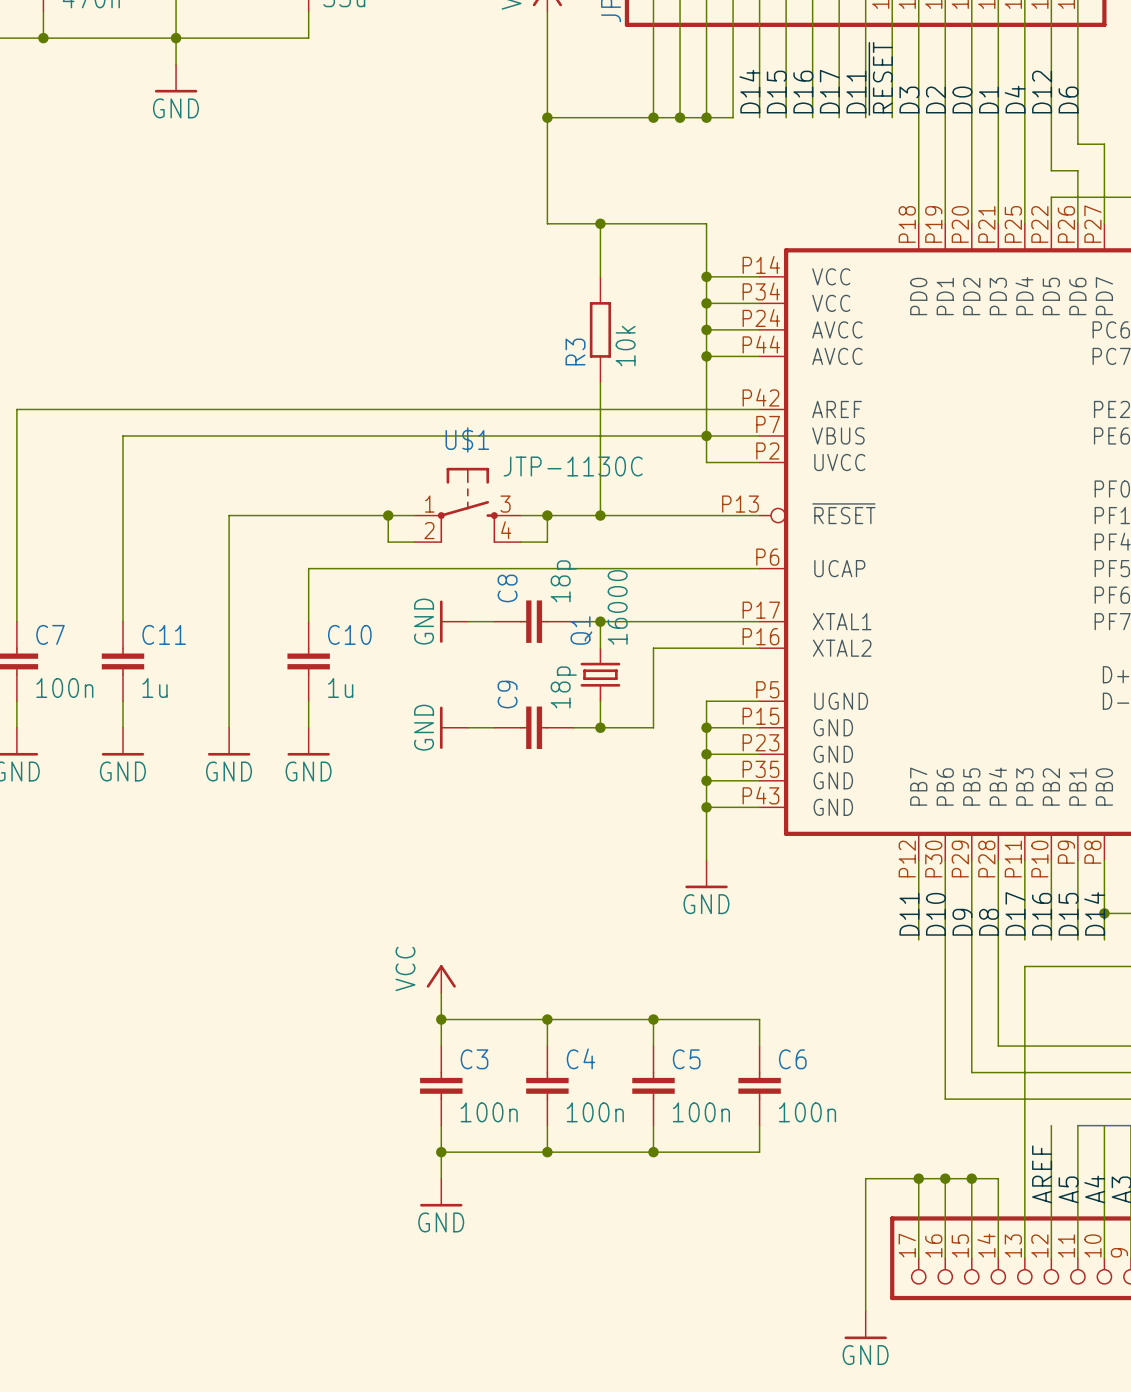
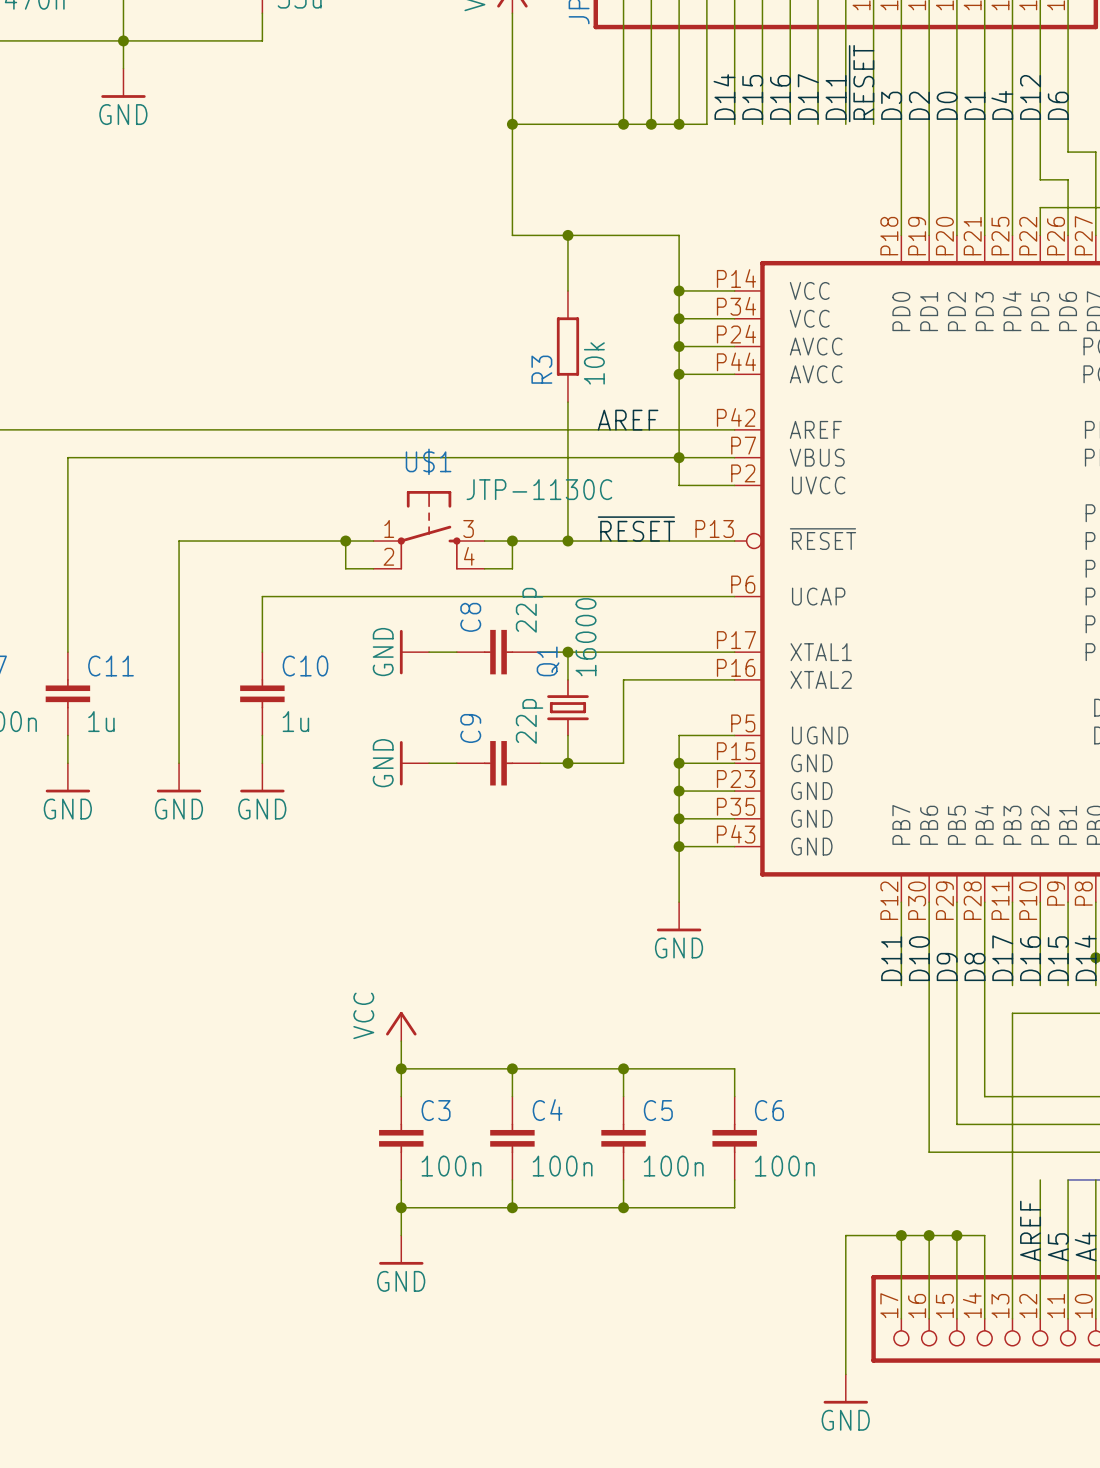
label: none -> AREF (628, 420)
label: none -> ~{RESET} (636, 529)
C8 value: 18p (563, 581) -> 22p (529, 610)
C9 value: 18p (563, 687) -> 22p (529, 721)

